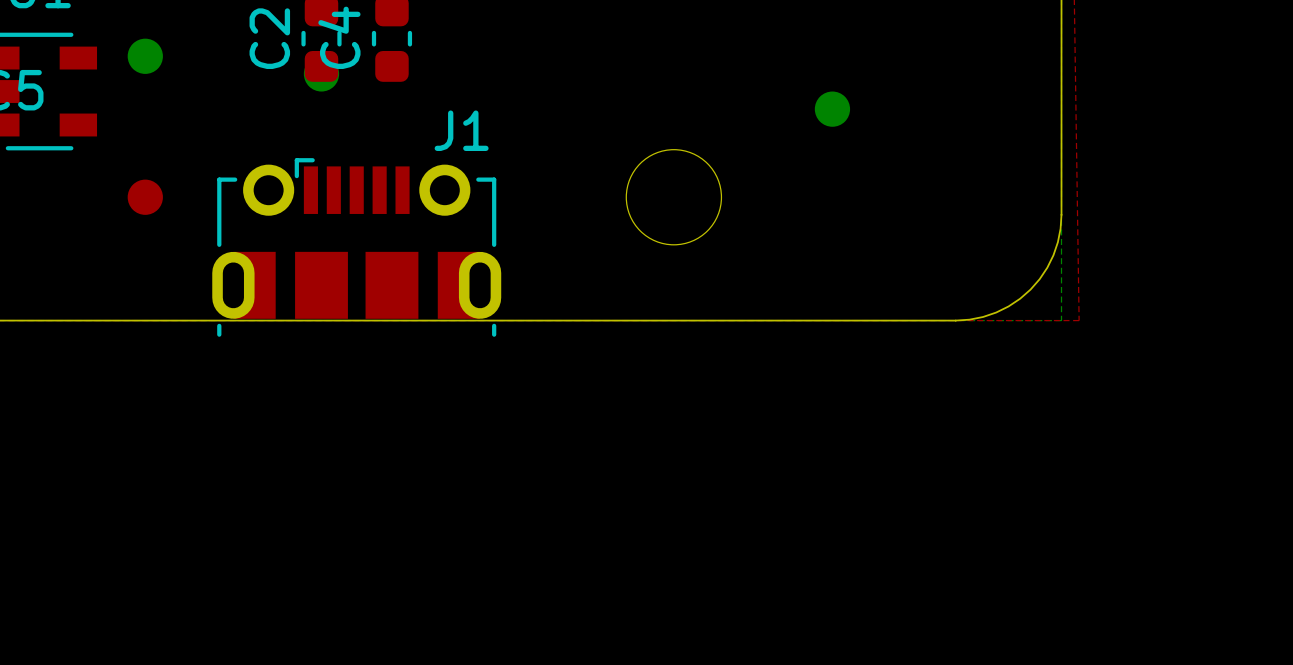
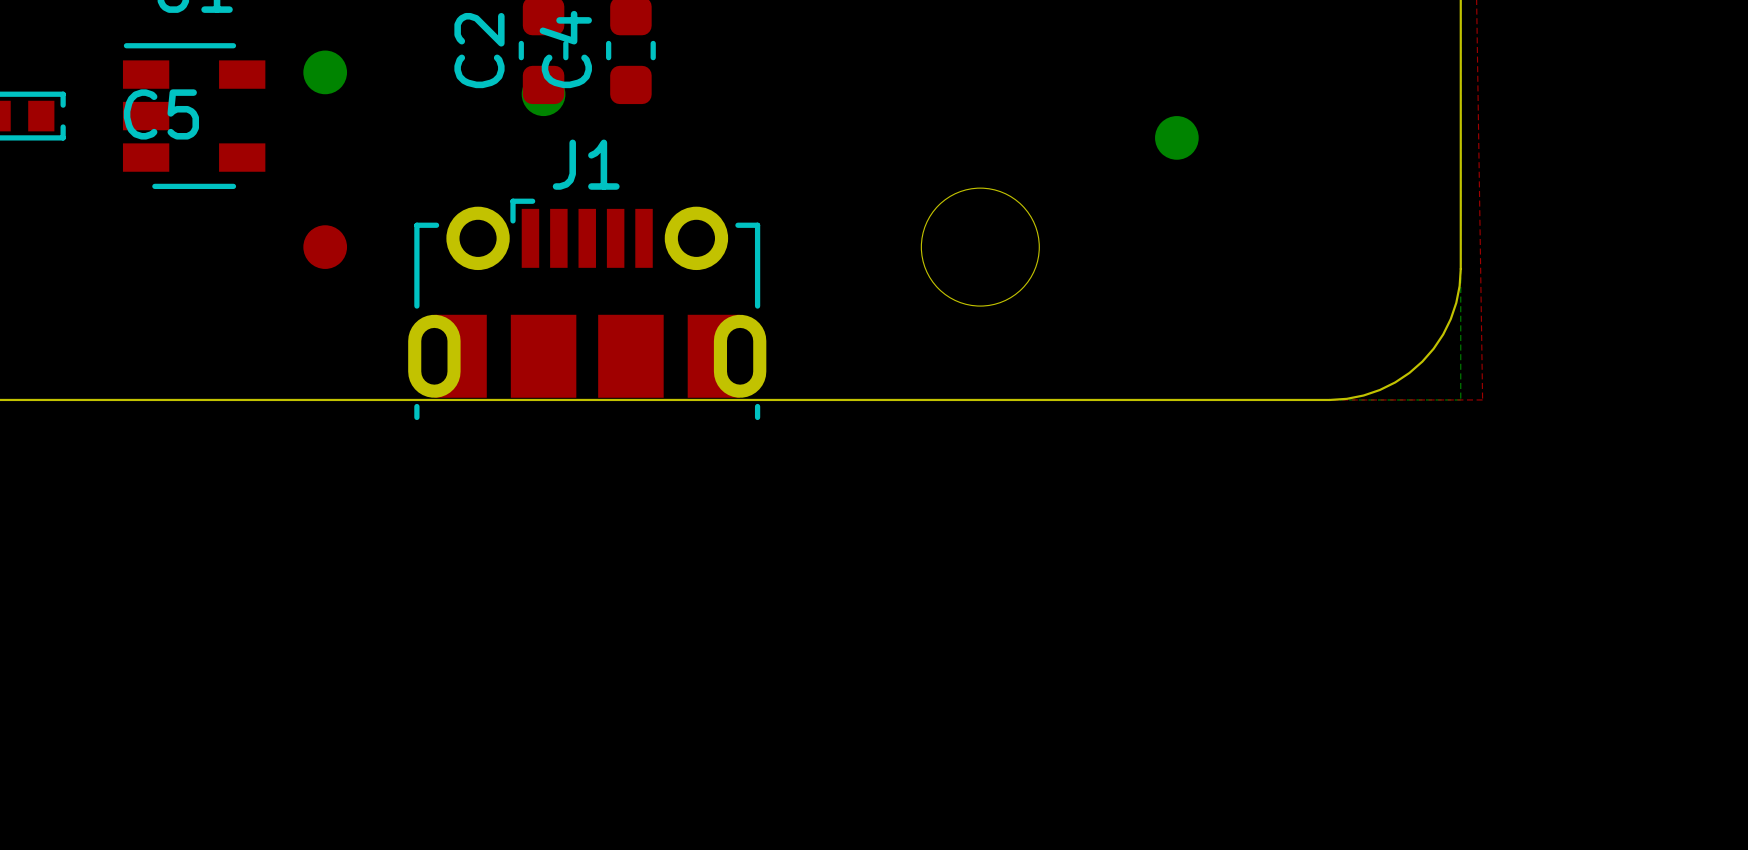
J1 name position: J1 (461, 130) -> J1 (586, 164)

